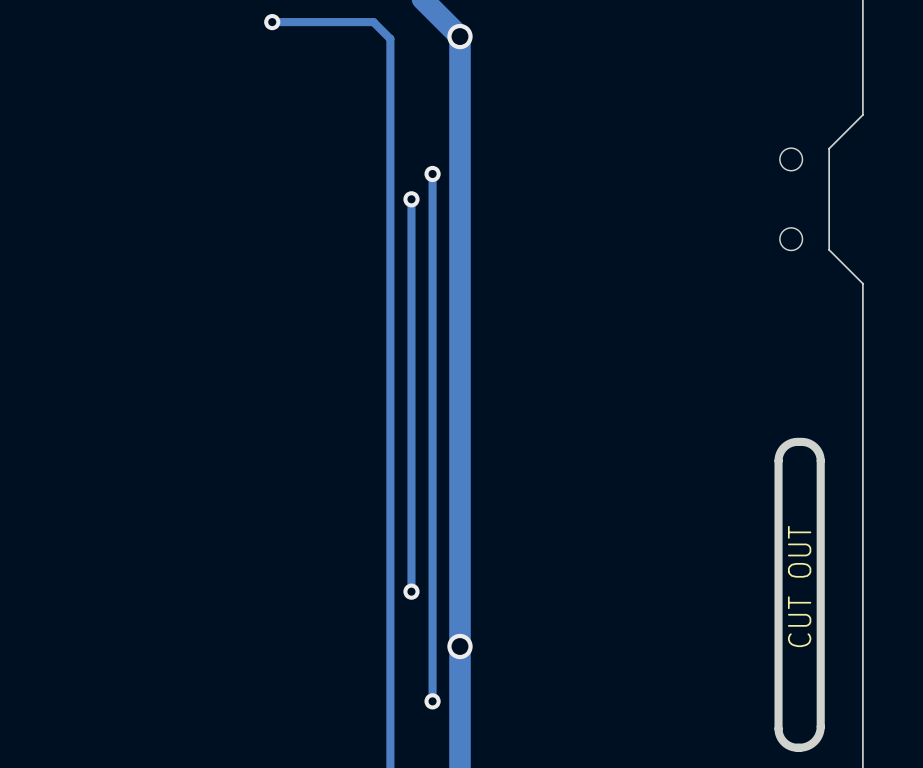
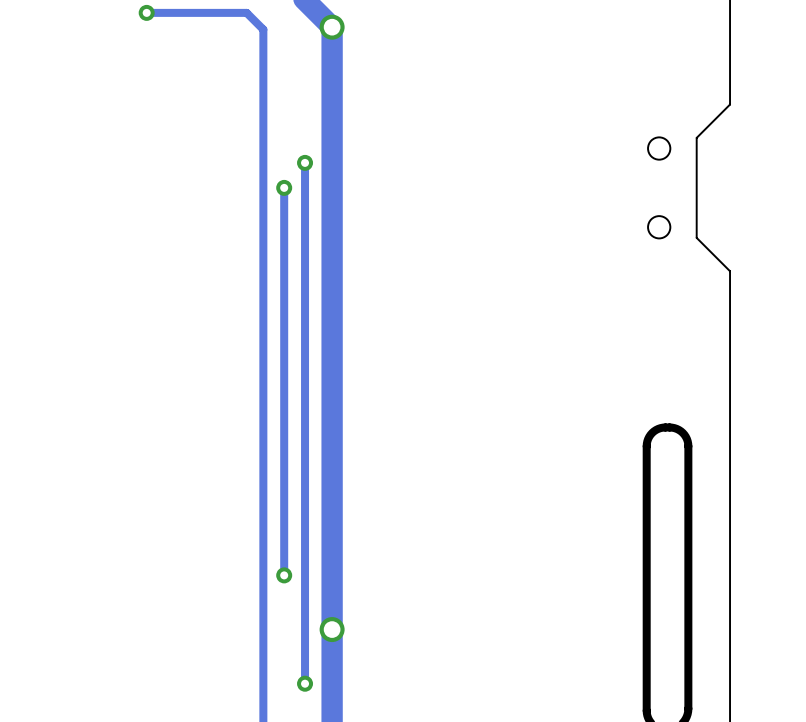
text: CUT OUT (799, 586) -> none

